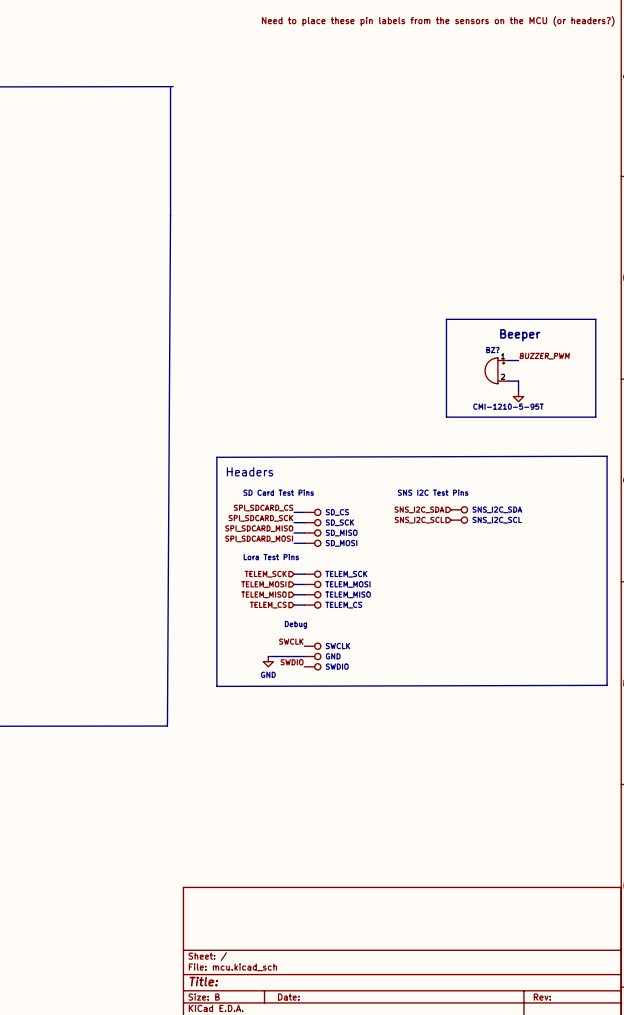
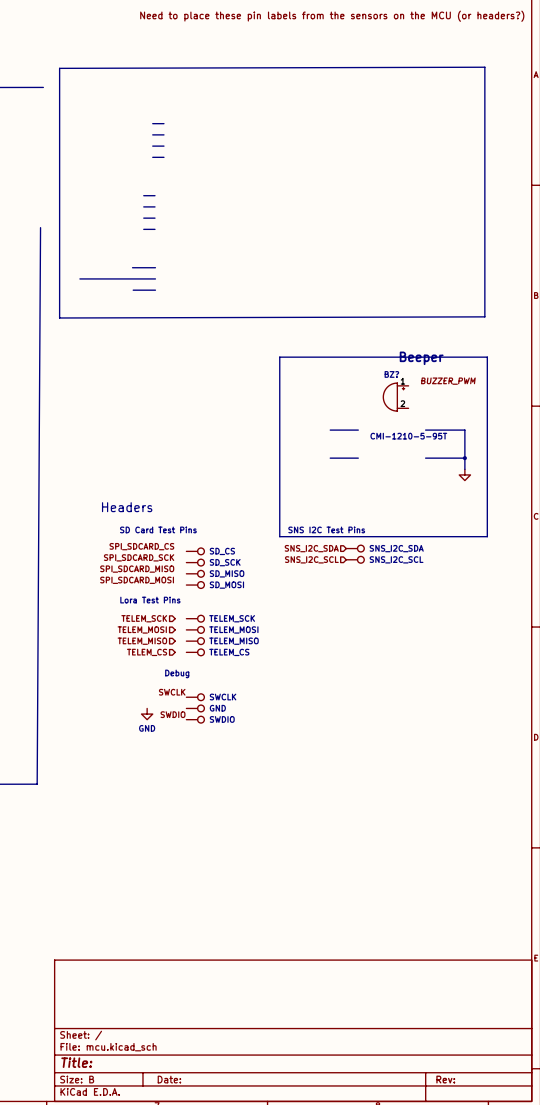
line: none -> (484, 67) (484, 316) (59, 318) (59, 68) (484, 67)
line: (170, 87) (170, 216) -> none
wire: none -> (152, 123) (163, 123)
wire: none -> (152, 134) (163, 134)
wire: none -> (152, 146) (163, 146)
wire: none -> (152, 157) (163, 157)
wire: none -> (143, 195) (154, 195)
wire: none -> (143, 206) (154, 206)
wire: none -> (143, 218) (154, 218)
wire: none -> (143, 229) (154, 229)
wire: none -> (132, 267) (155, 267)
wire: none -> (79, 278) (155, 278)
wire: none -> (133, 290) (155, 290)
line: (446, 319) (446, 417) (595, 417) (595, 319) (446, 319) -> none
line: none -> (279, 357) (279, 536) (487, 536) (487, 357) (279, 357)
wire: (508, 360) (518, 360) -> none
wire: (508, 381) (518, 381) (518, 391) -> none
power symbol position: (518, 396) -> (464, 474)
wire: none -> (330, 430) (358, 430)
wire: none -> (425, 430) (464, 430) (464, 469)
wire: none -> (330, 458) (358, 458)
wire: none -> (425, 458) (464, 458)
junction: none -> (464, 458)
line: (607, 456) (607, 685) (216, 686) (216, 457) (607, 456) -> none
wire: (294, 512) (304, 512) -> none
wire: (294, 522) (304, 522) -> none
wire: (294, 532) (304, 532) -> none
wire: (294, 543) (304, 543) -> none
wire: (294, 574) (304, 574) -> none
wire: (294, 584) (304, 584) -> none
wire: (294, 594) (304, 594) -> none
wire: (294, 605) (304, 605) -> none
wire: (268, 656) (304, 656) -> none

